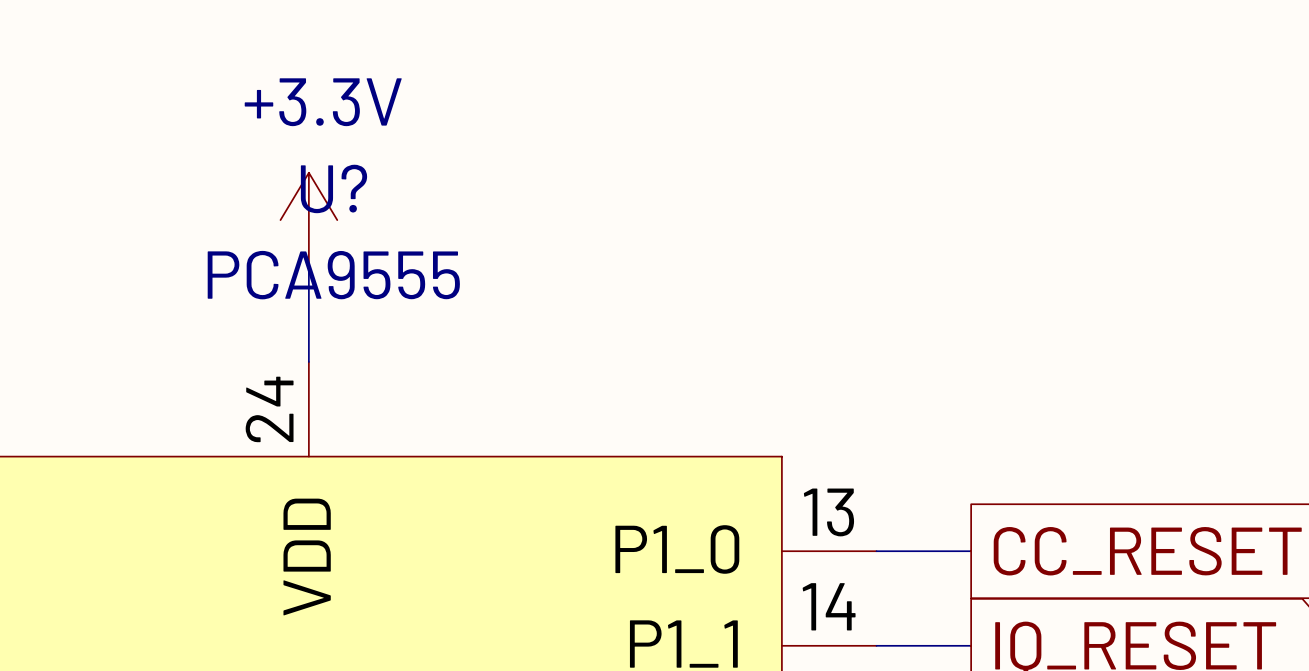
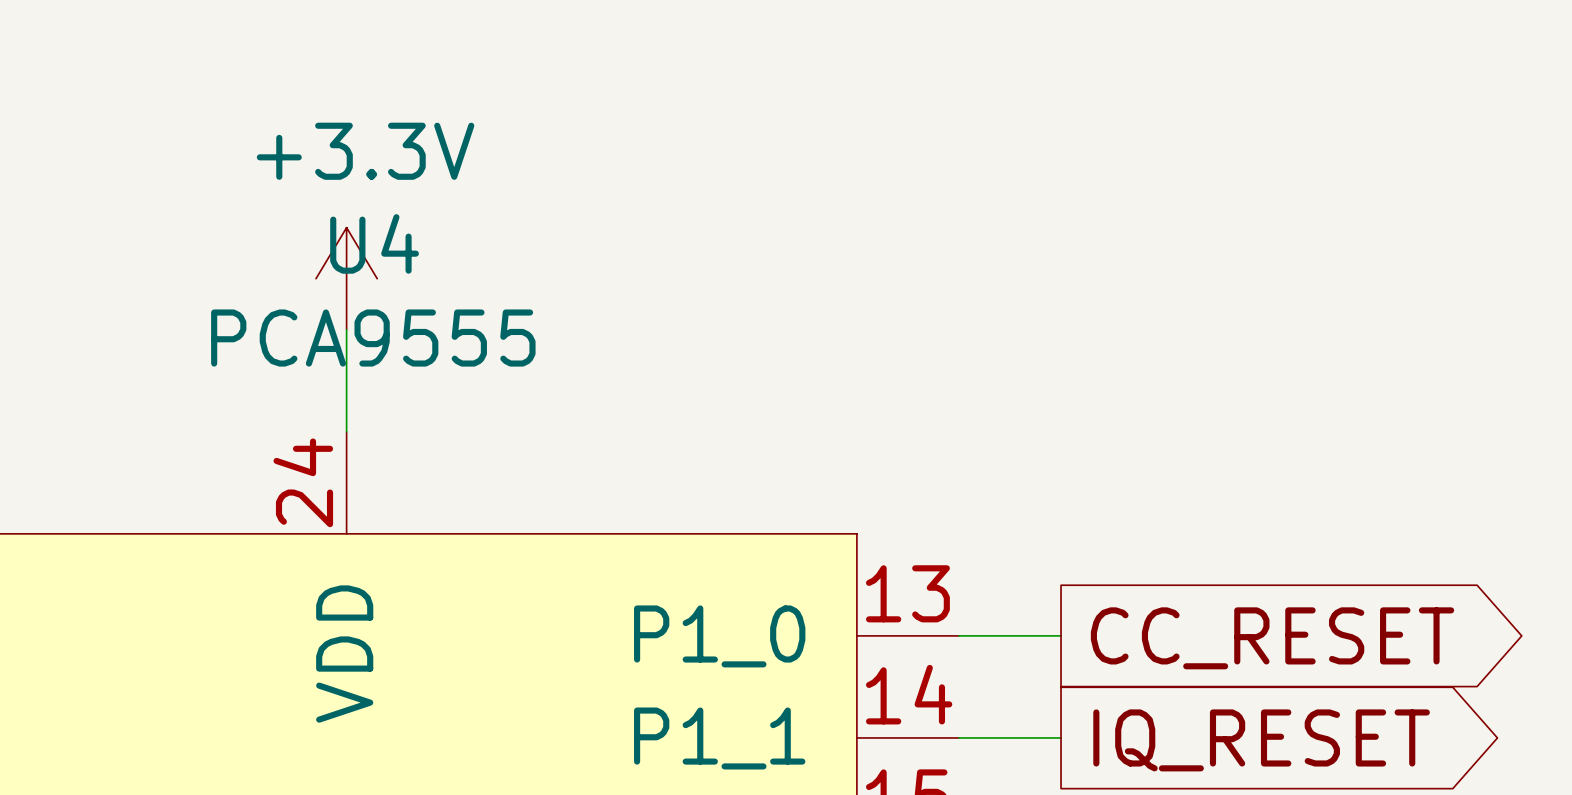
U? name: U? (333, 188) -> U4 (374, 243)

